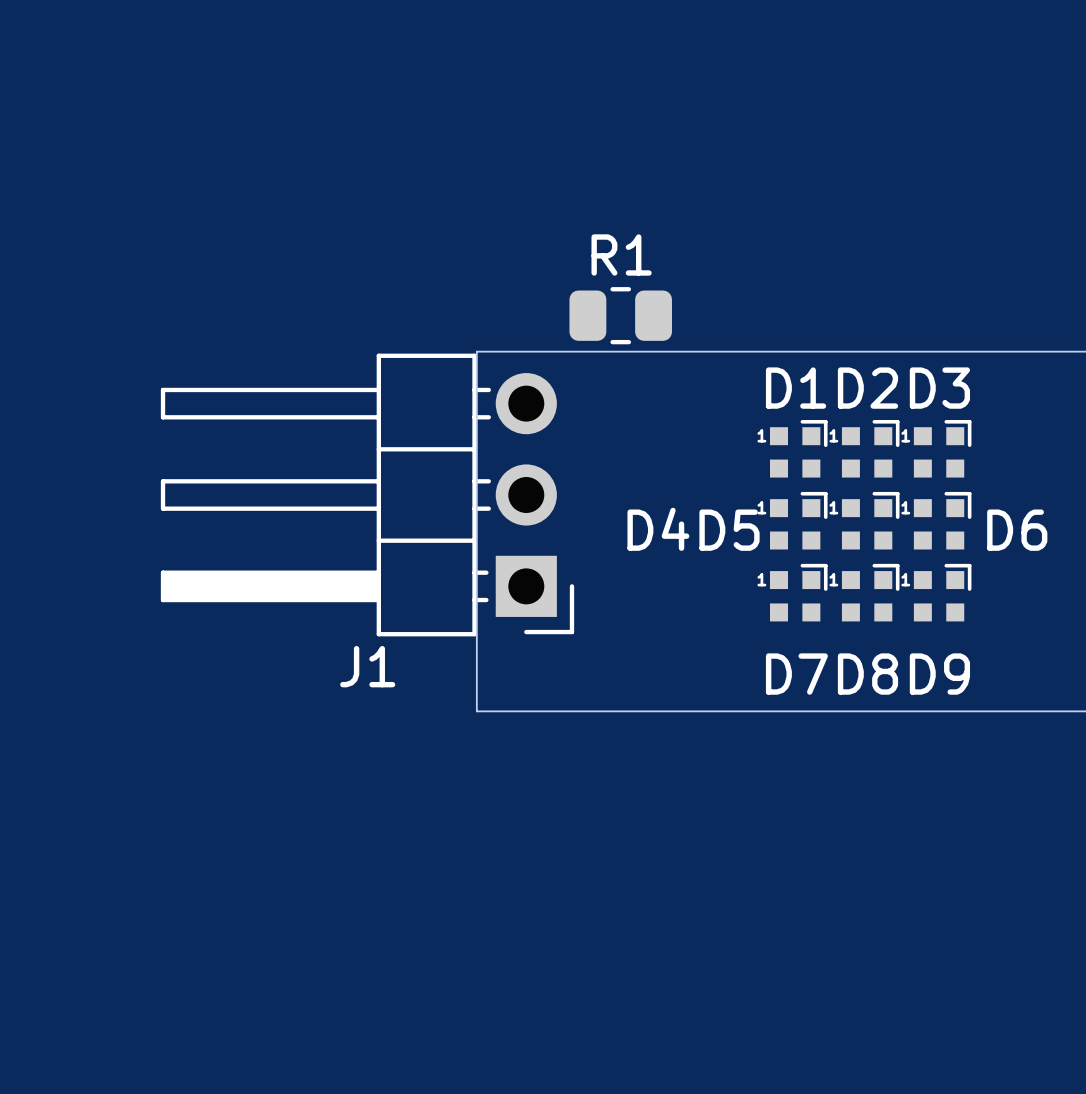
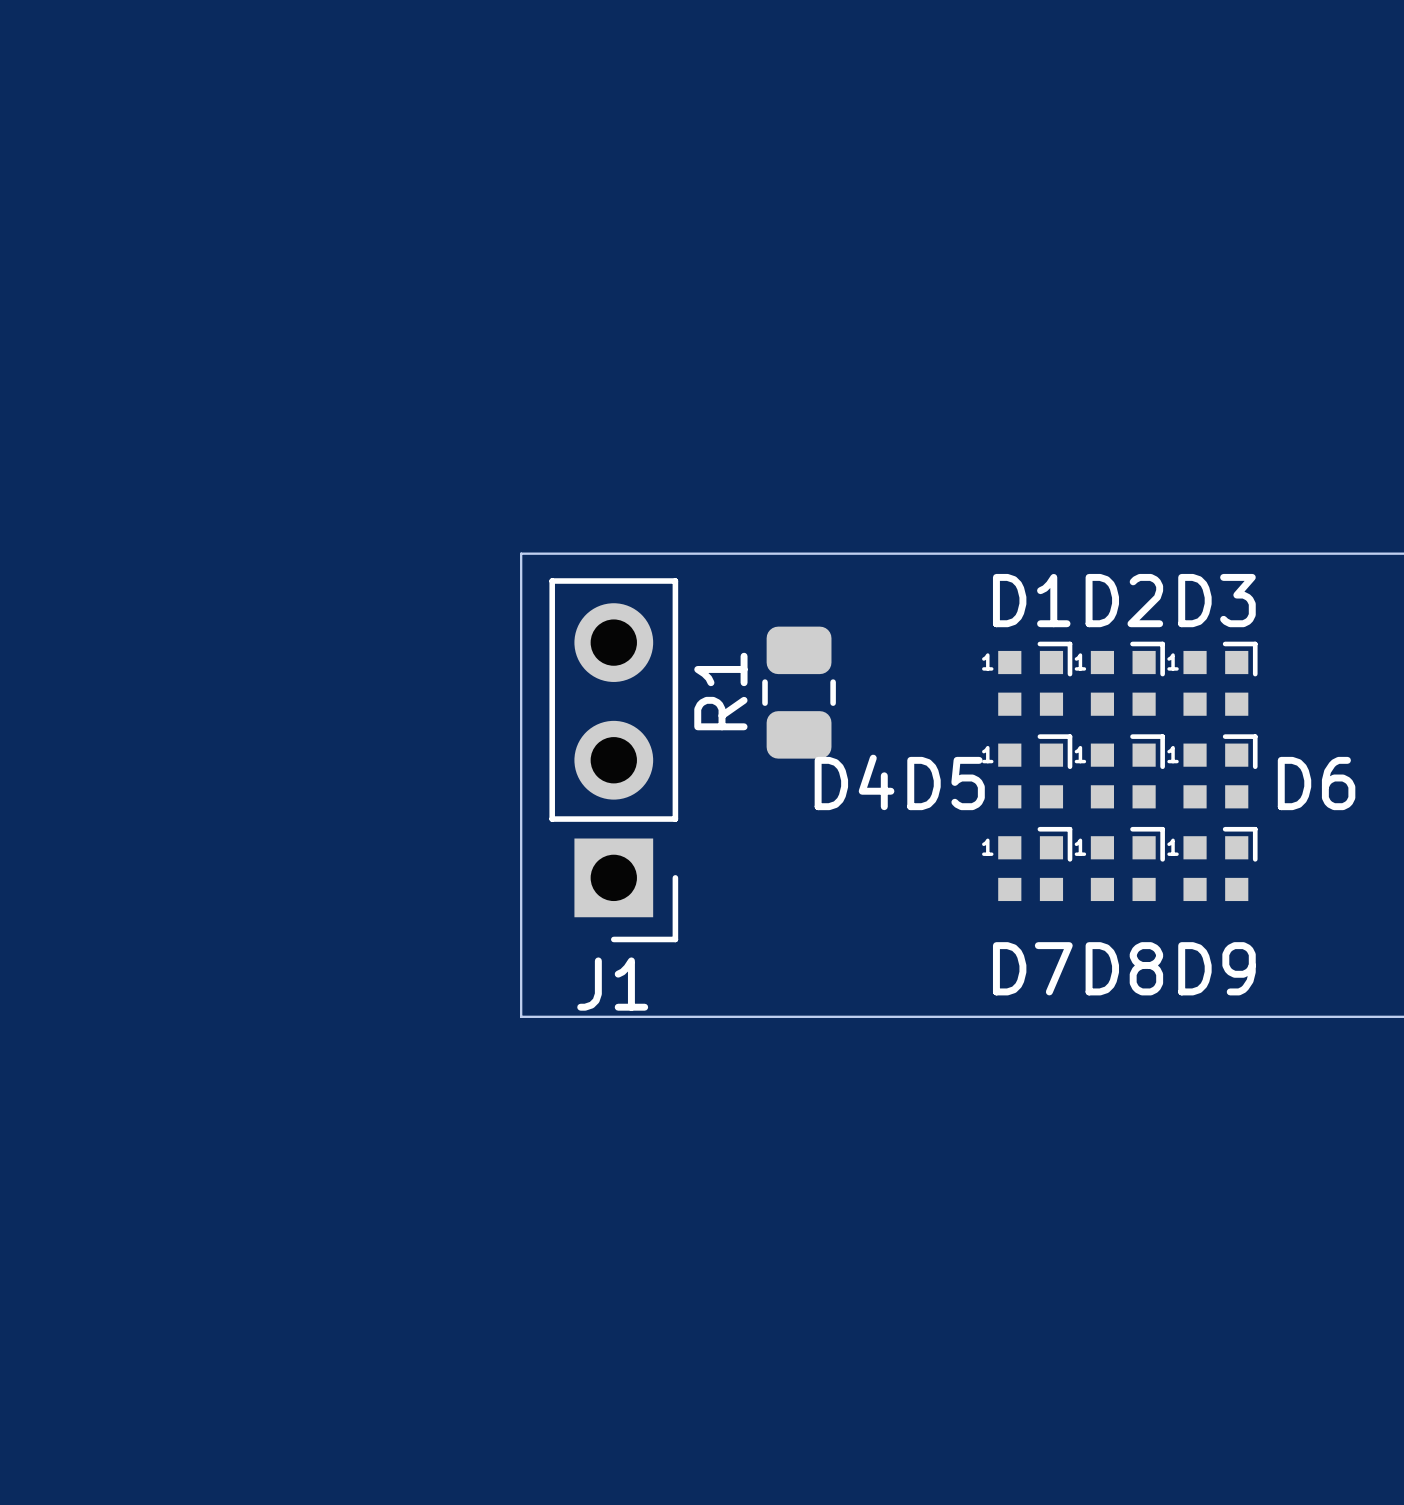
R1 name position: R1 (621, 254) -> R1 (720, 691)
R1 rotation: 0° (620, 315) -> 90° clockwise (799, 692)
R1 position: (620, 315) -> (799, 692)
board edge: (476, 351) (476, 711) -> (620, 553) (521, 553) (521, 1016) (620, 1016)
J1 footprint: [160, 353, 575, 637] -> [549, 578, 679, 943]

